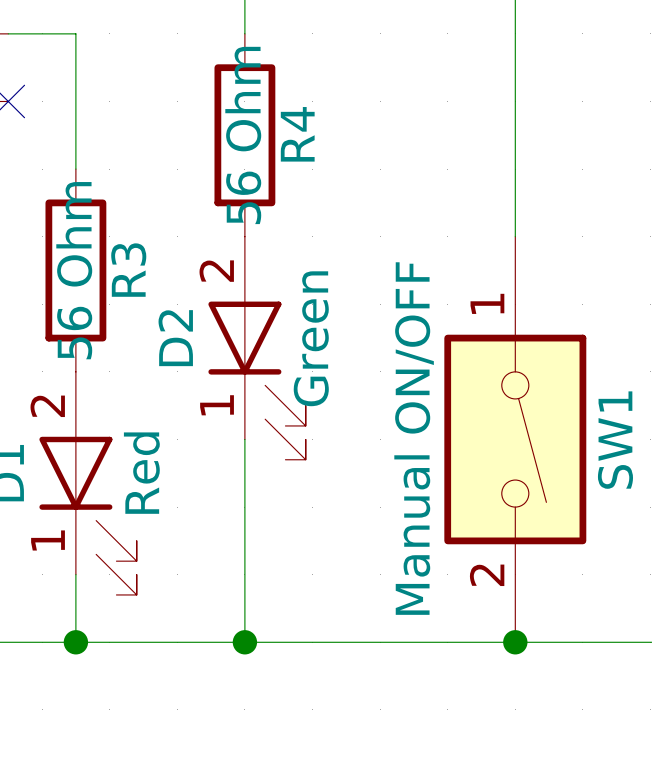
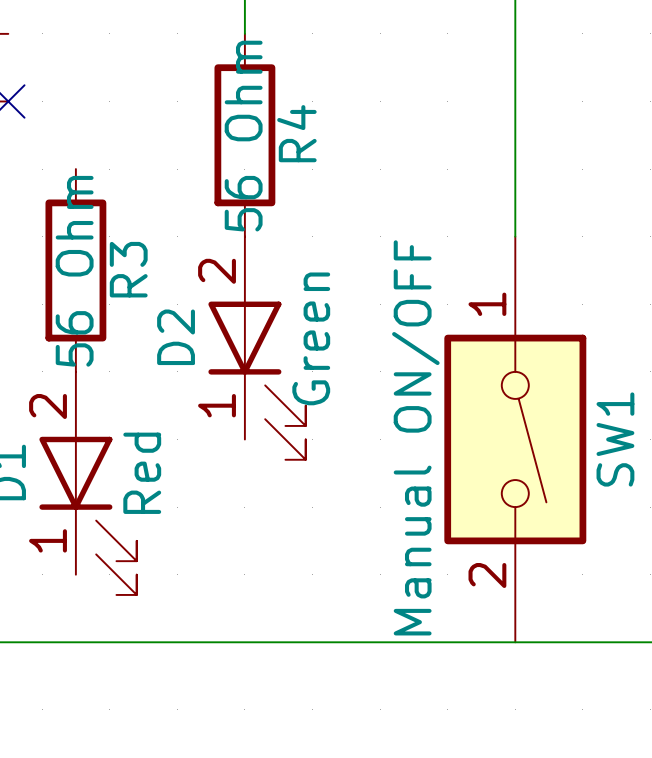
wire: (8, 33) (75, 33) (75, 169) -> none
wire: (244, 439) (244, 642) -> none
wire: (75, 574) (75, 642) -> none
junction: (75, 642) -> none
junction: (244, 642) -> none
junction: (515, 642) -> none

